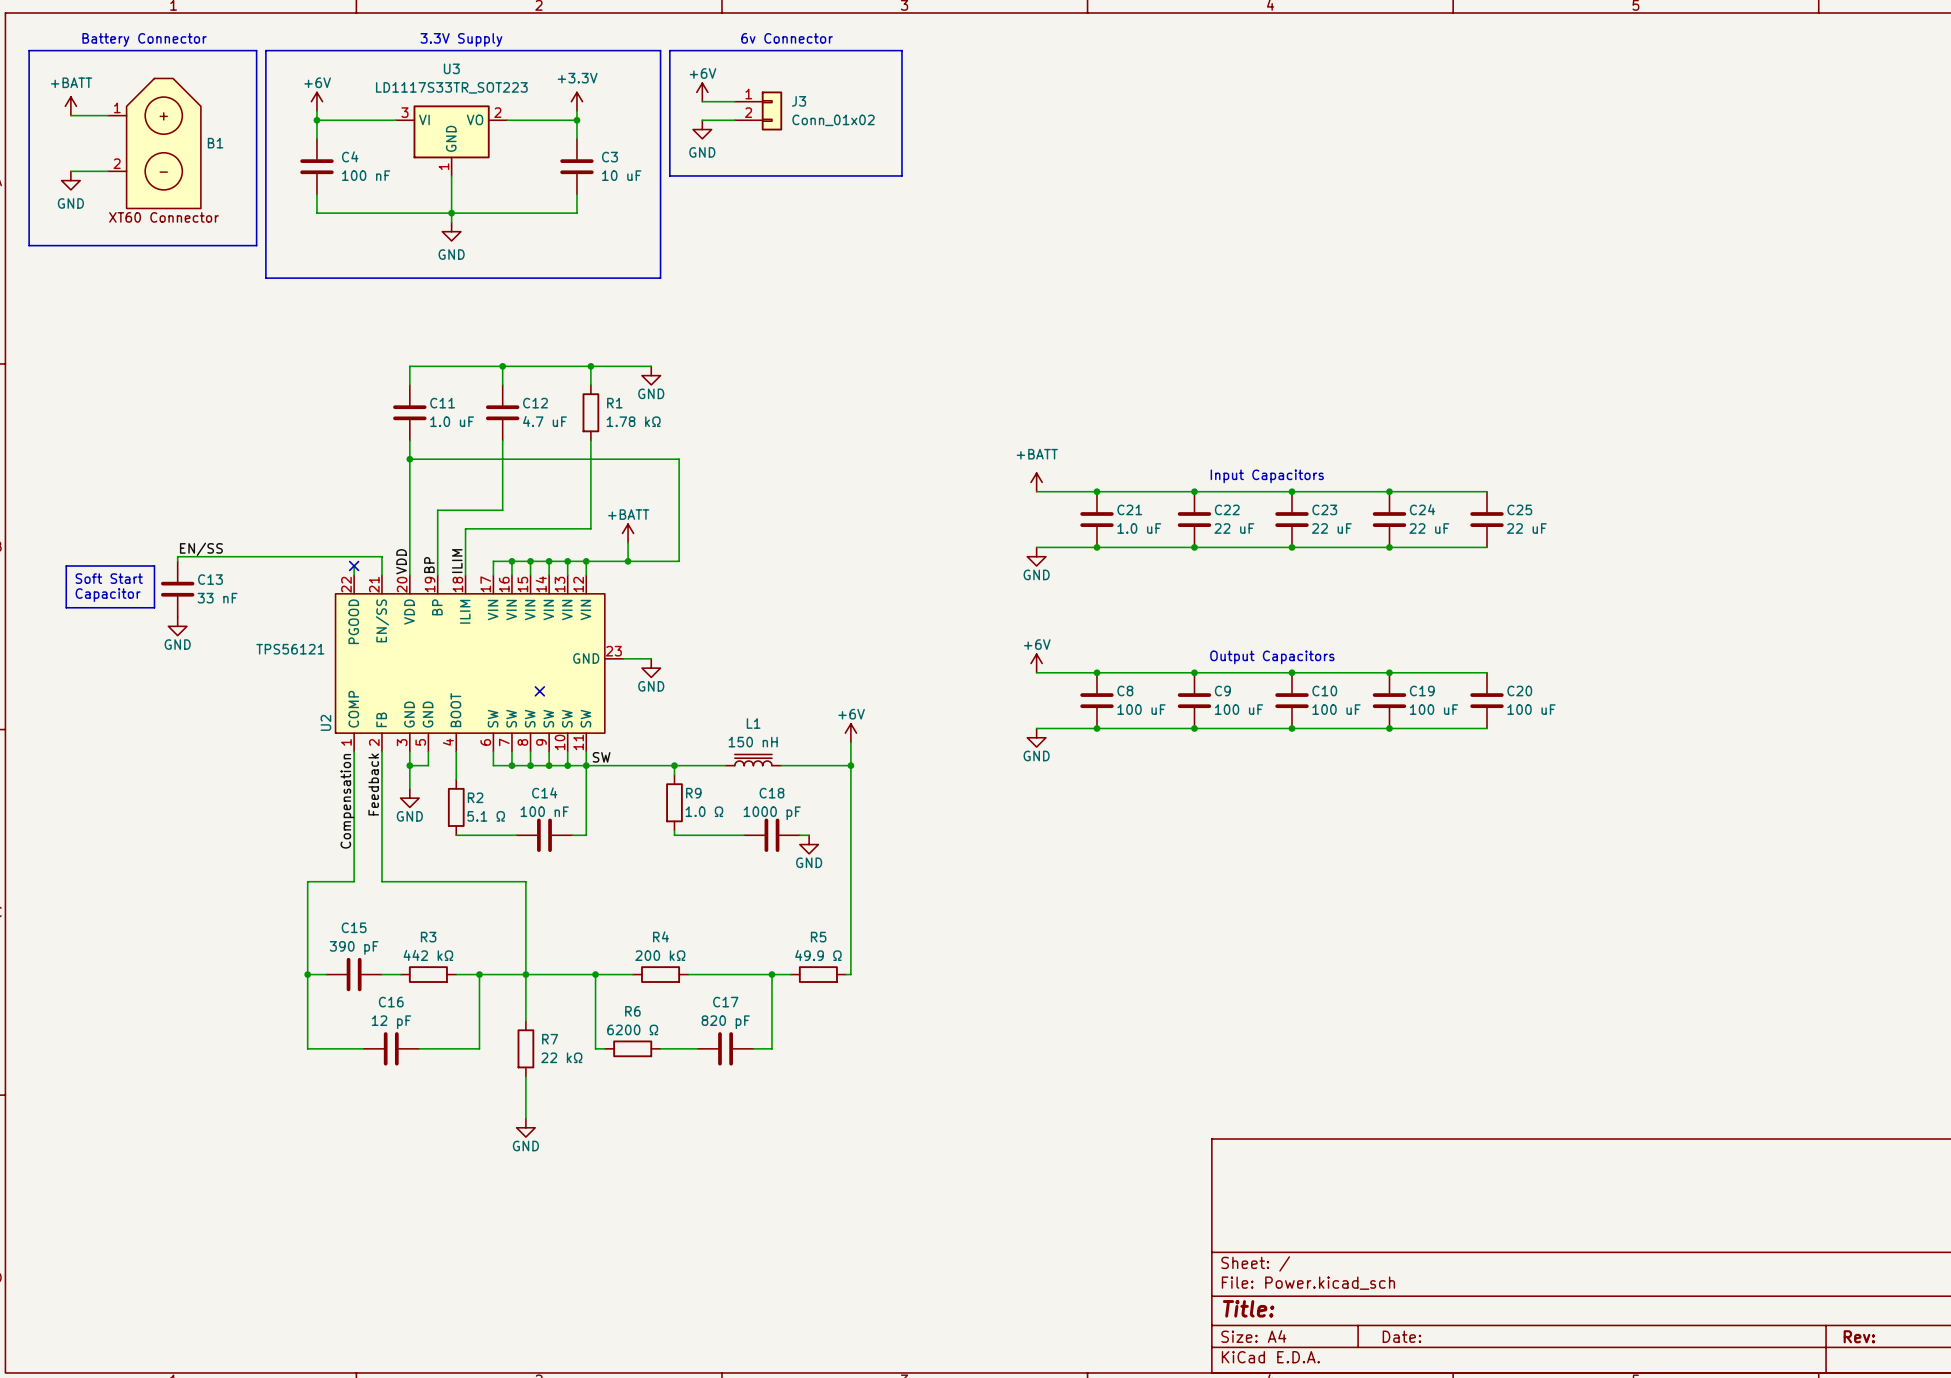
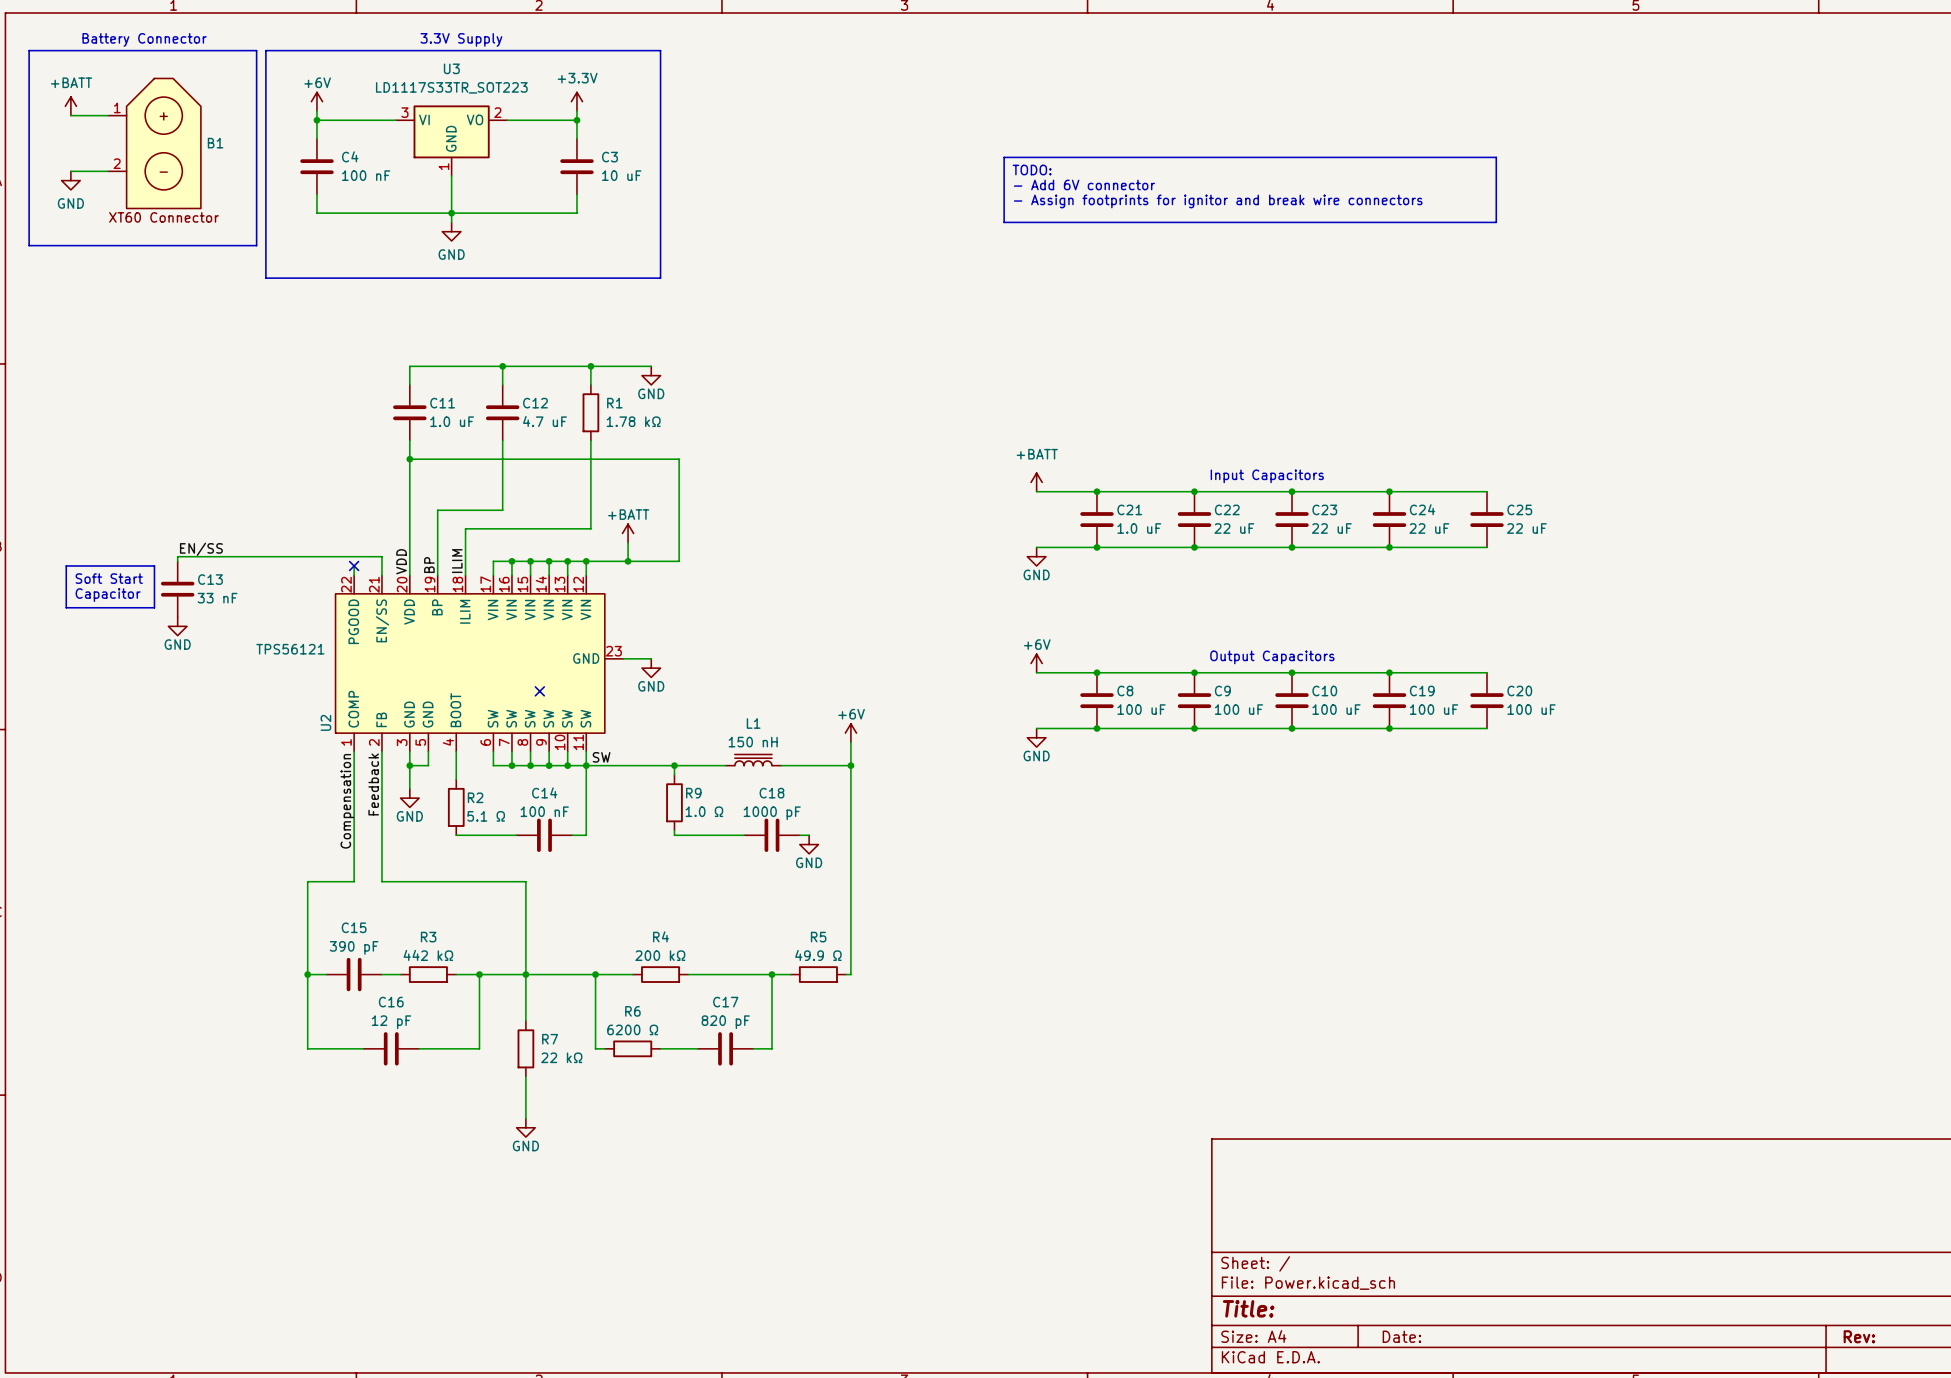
text: 6v Connector (787, 38) -> none
line: (669, 50) (901, 50) (901, 175) (669, 175) (669, 50) -> none
power symbol: +6V (702, 92) -> none
wire: (702, 101) (734, 101) -> none
J3: Conn_01x02 (758, 110) -> none
wire: (702, 120) (734, 120) -> none
power symbol: GND (702, 129) -> none
line: none -> (1004, 157) (1496, 157) (1496, 222) (1004, 222) (1004, 157)
text: none -> TODO: (1032, 170)
text: none -> - Add 6V connector (1084, 184)
text: none -> - Assign footprints for ignitor and break wire connectors (1218, 201)

